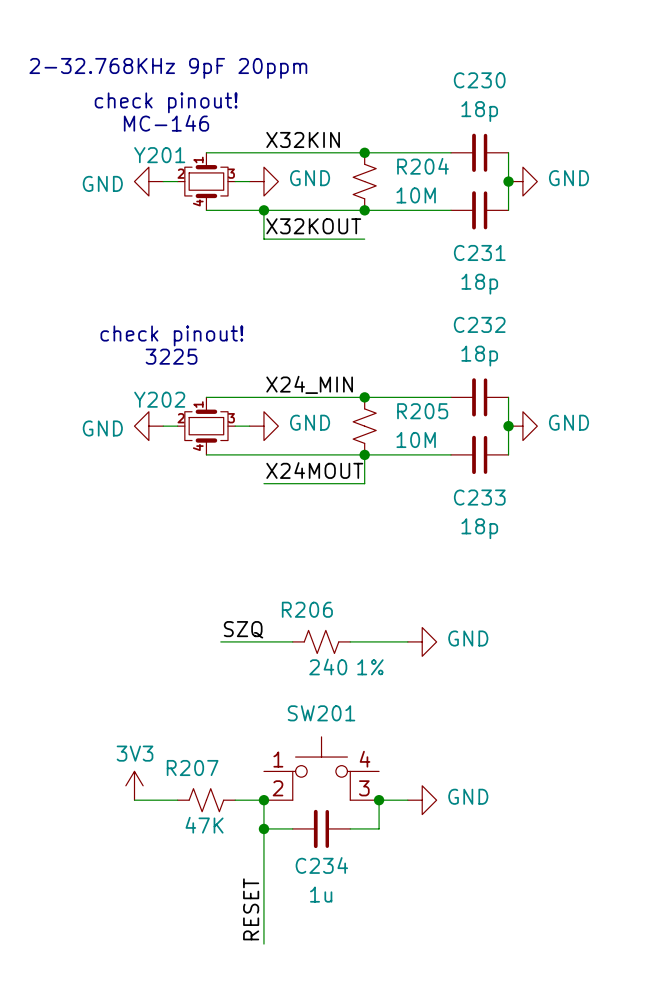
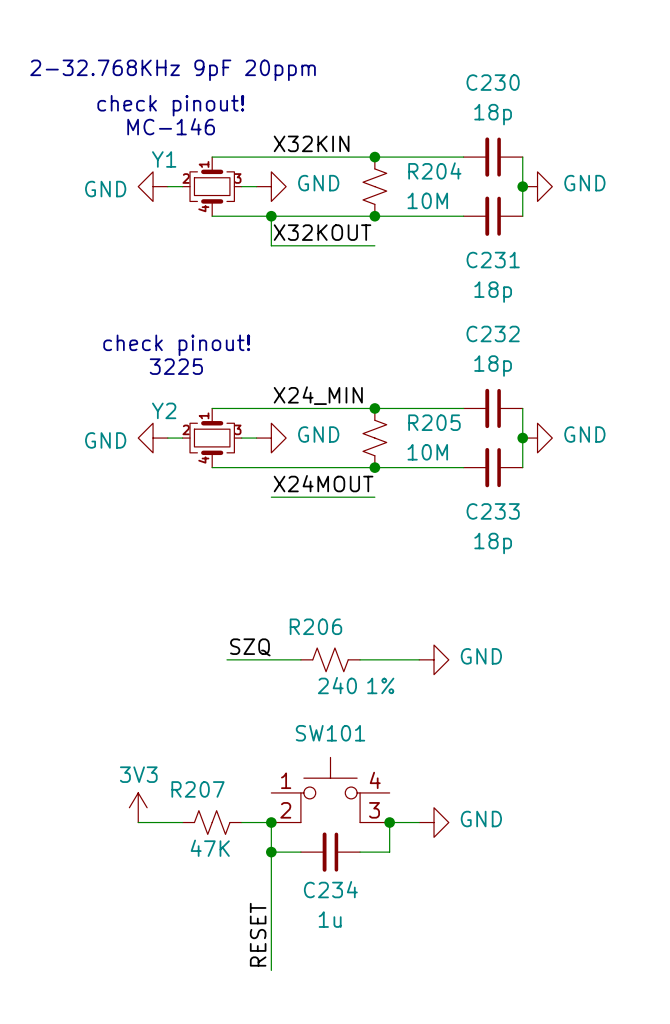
Y201 name: Y201 (159, 155) -> Y1 (164, 159)
Y202 name: Y202 (159, 399) -> Y2 (164, 410)
wire: (364, 454) (364, 483) -> none
SW201 name: SW201 (321, 713) -> SW101 (330, 733)

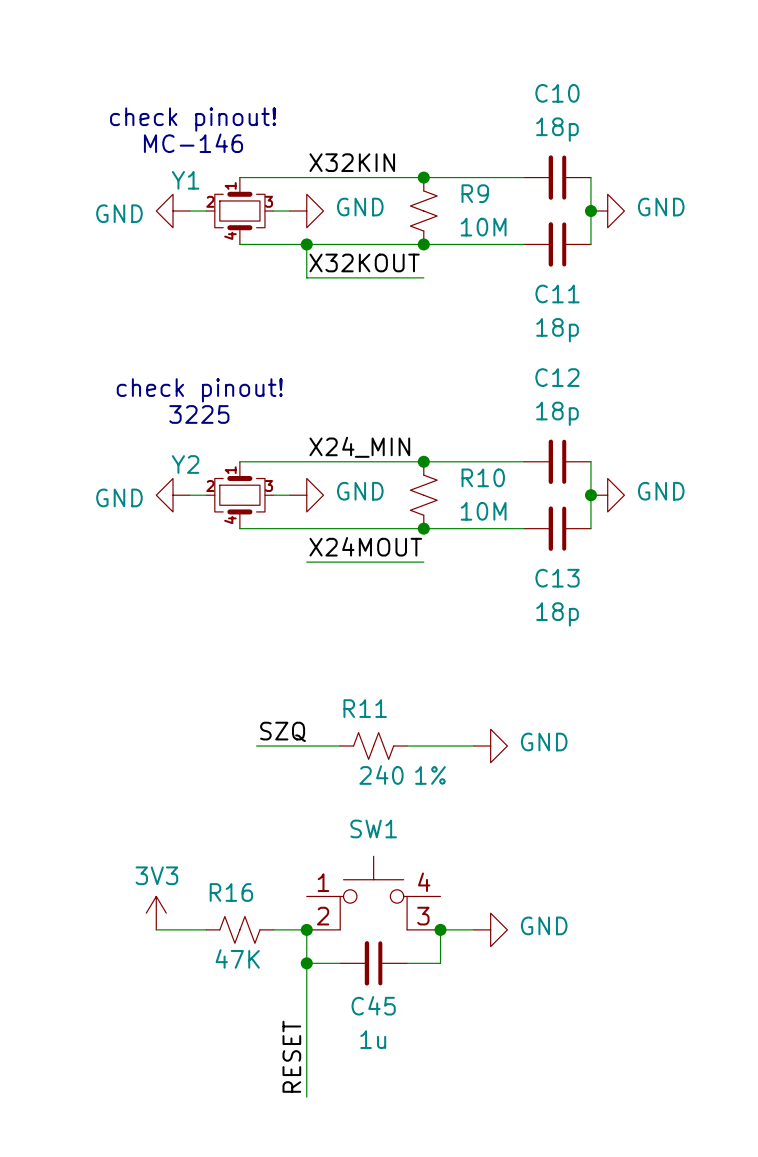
text: 2-32.768KHz 9pF 20ppm (173, 70) -> none
C230 name: C230 (493, 82) -> C10 (557, 93)
R204 name: R204 (434, 170) -> R9 (475, 193)
C231 name: C231 (493, 260) -> C11 (557, 293)
C232 name: C232 (493, 333) -> C12 (557, 377)
R205 name: R205 (434, 422) -> R10 (483, 477)
C233 name: C233 (493, 511) -> C13 (557, 578)
R206 name: R206 (315, 626) -> R11 (365, 708)
SW101 name: SW101 (330, 733) -> SW1 (373, 828)
R207 name: R207 (198, 789) -> R16 (231, 892)
C234 name: C234 (330, 889) -> C45 (373, 1005)

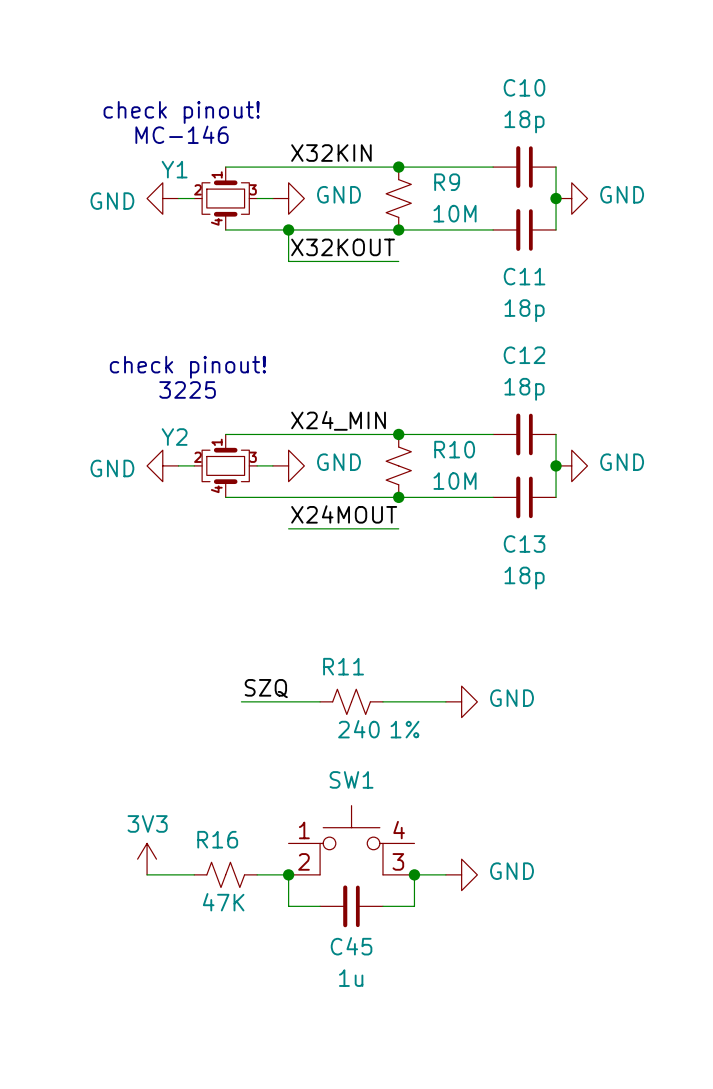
wire: (306, 963) (306, 1097) -> none
junction: (306, 963) -> none
label: RESET (291, 1056) -> none

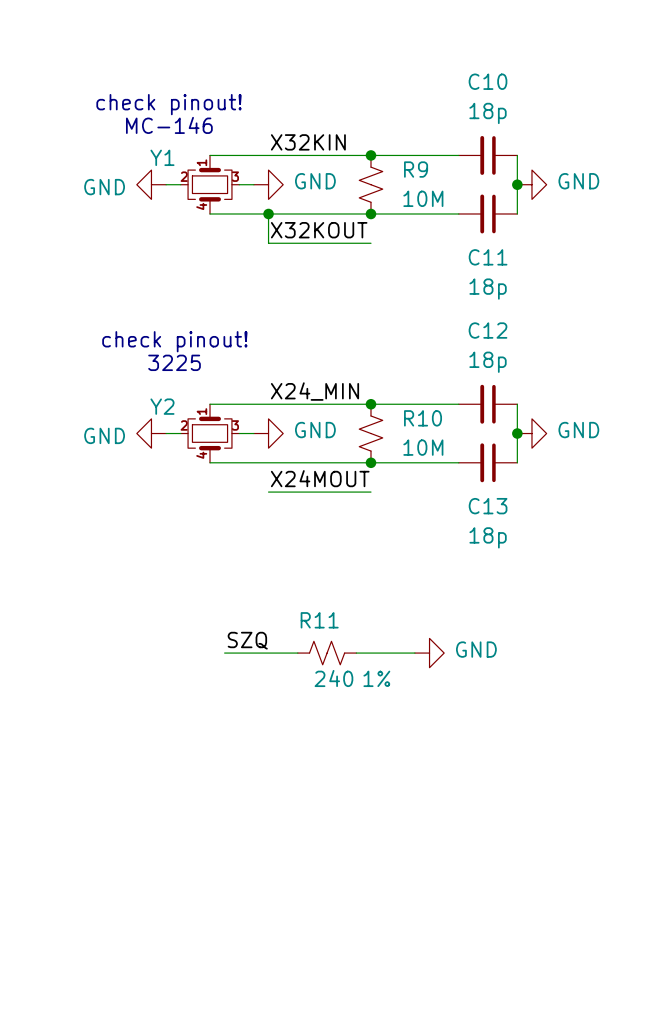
SW1: (351, 840) -> none
power symbol: 3V3 (147, 859) -> none
wire: (147, 874) (194, 874) -> none
R16: 47K (225, 874) -> none
wire: (257, 874) (288, 874) (288, 906) (320, 906) -> none
junction: (288, 874) -> none
junction: (414, 874) -> none
wire: (445, 874) (414, 874) (414, 906) (382, 906) -> none
power symbol: GND (461, 874) -> none
C45: 1u (351, 906) -> none

